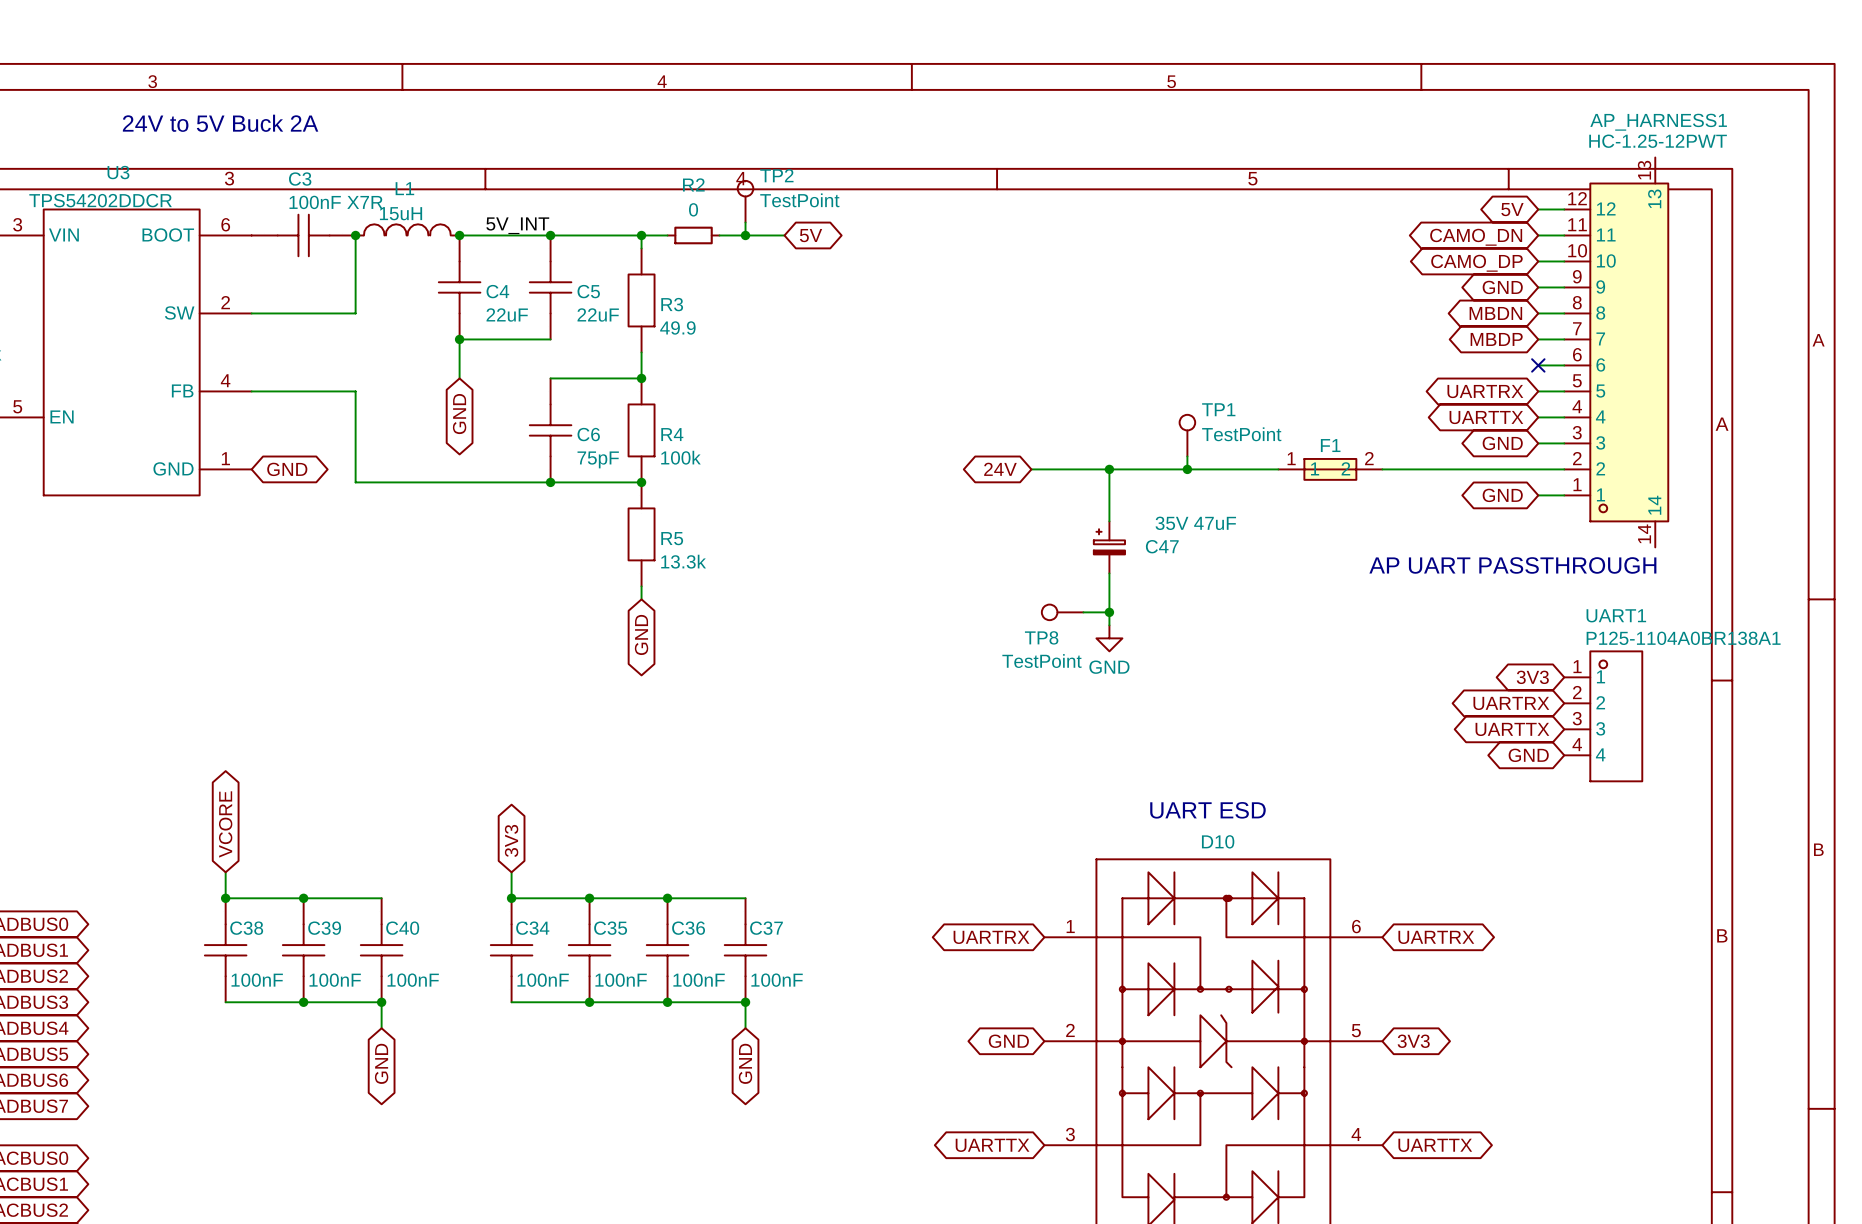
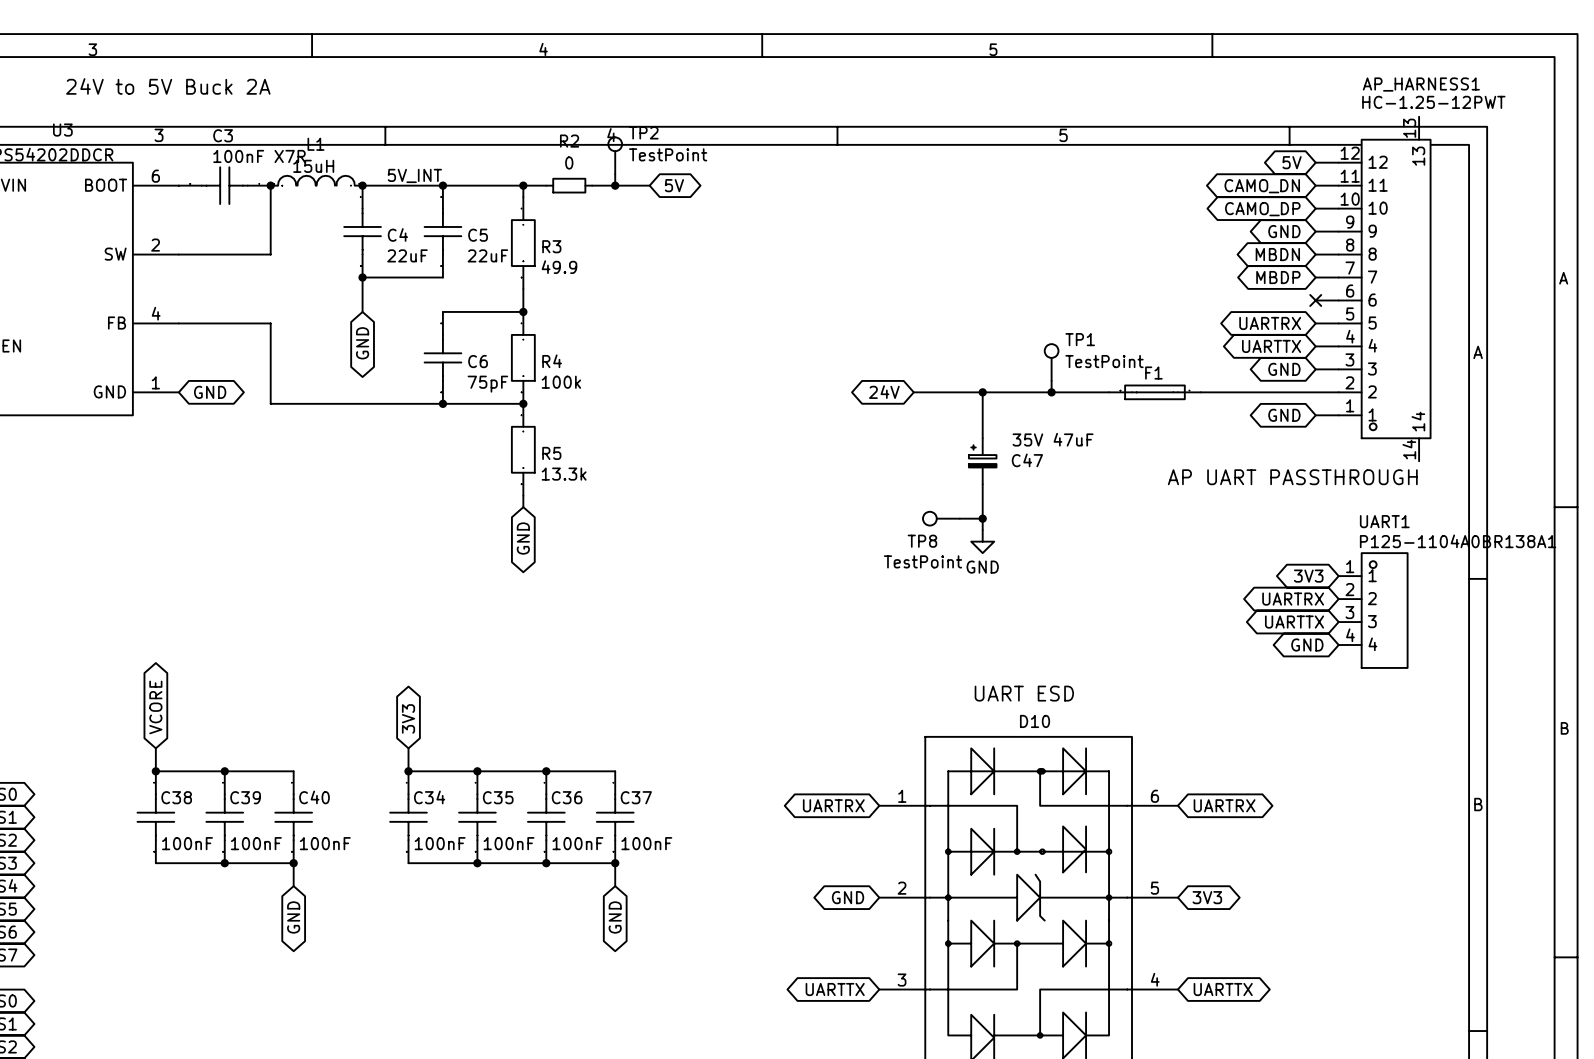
TP1 position: (1187, 435) -> (1051, 362)
wire: (1187, 456) (1187, 469) -> (1051, 380) (1051, 392)
F1 symbol: [1278, 458, 1383, 480] -> [1109, 385, 1201, 400]
global label position: 24V (1000, 469) -> 24V (884, 392)
wire: (1031, 469) (1083, 469) -> none
wire: (1109, 469) (1109, 521) -> (982, 392) (982, 438)
junction: (1109, 469) -> none
junction: none -> (982, 392)
junction: (1187, 469) -> none
junction: none -> (1051, 392)
C47 position: (1109, 547) -> (982, 461)
wire: (1109, 573) (1109, 625) -> (982, 484) (982, 530)
TP8 position: (1062, 612) -> (941, 518)
wire: (1083, 612) (1109, 612) -> (959, 518) (982, 518)
junction position: (1109, 612) -> (982, 518)
power symbol position: GND (1109, 638) -> GND (982, 541)

